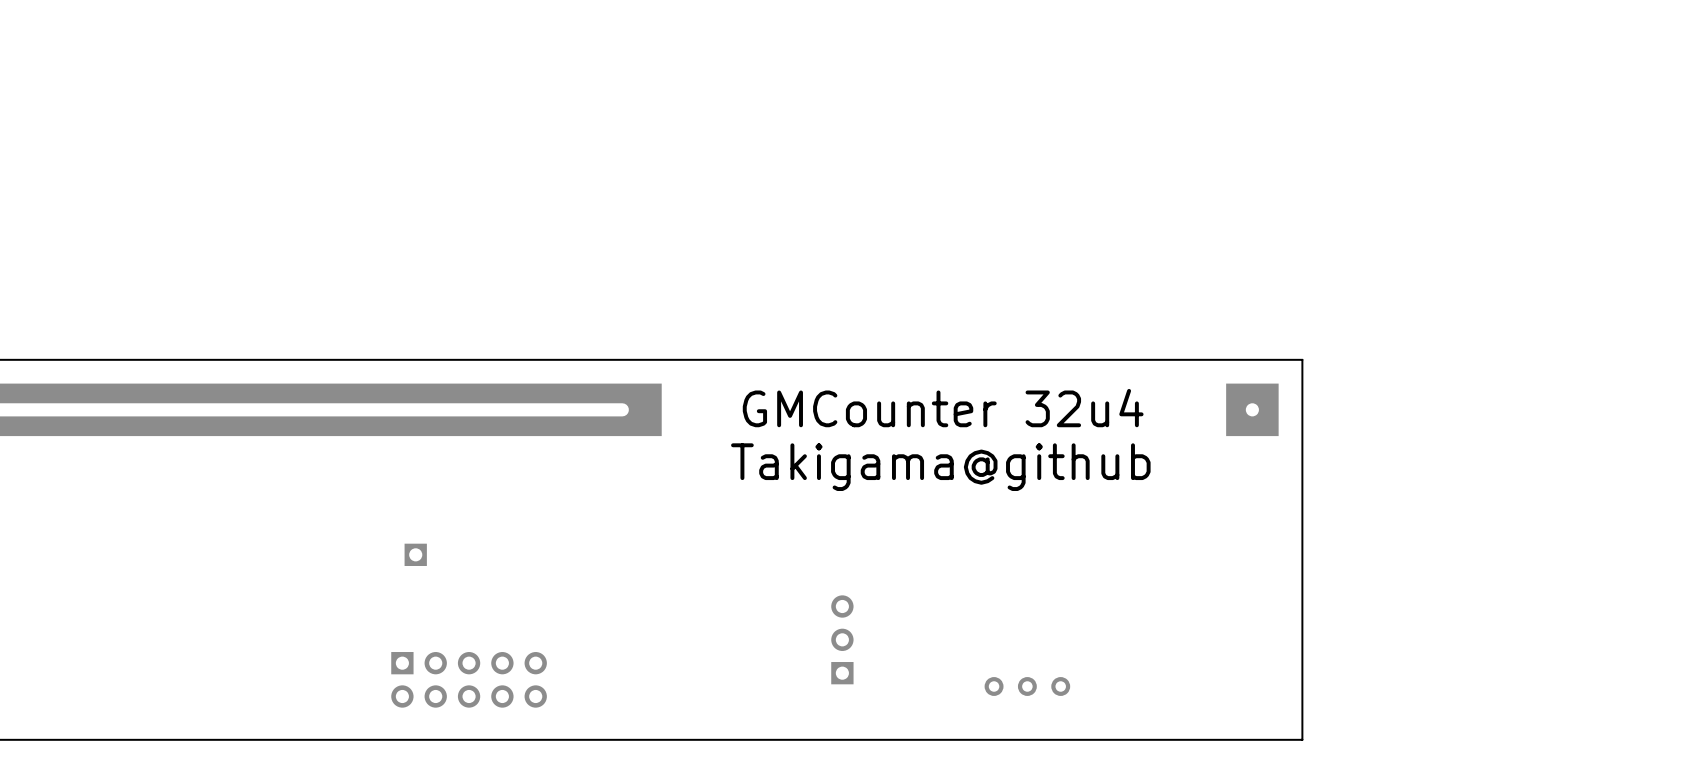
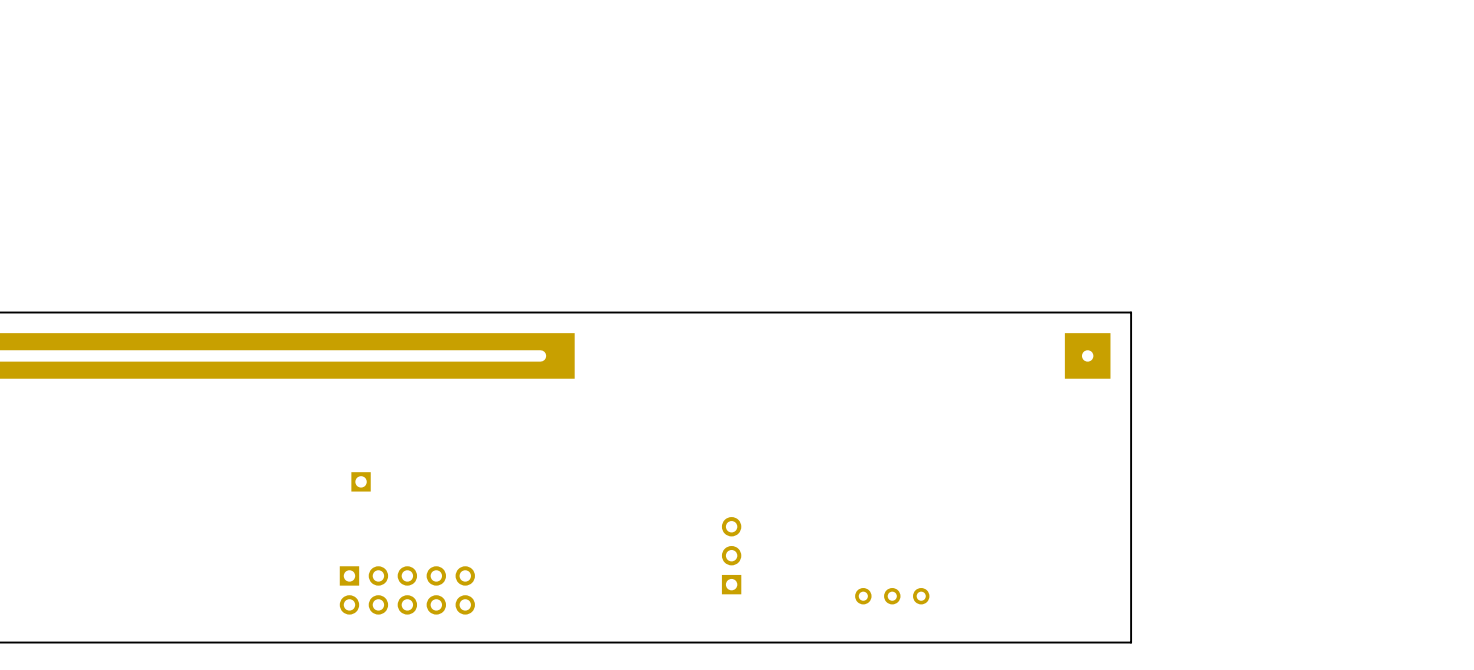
text: GMCounter 32u4 (943, 408) -> none
text: Takigama@github (940, 467) -> none

